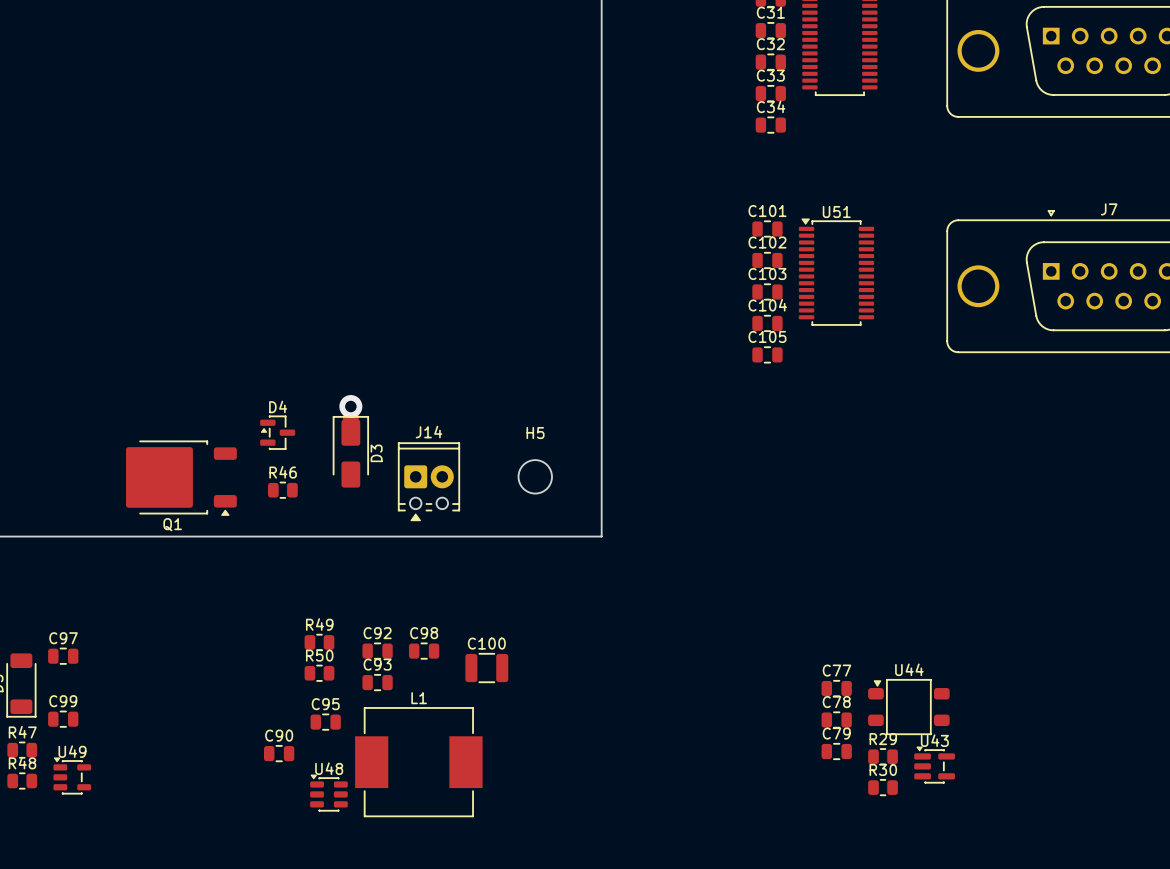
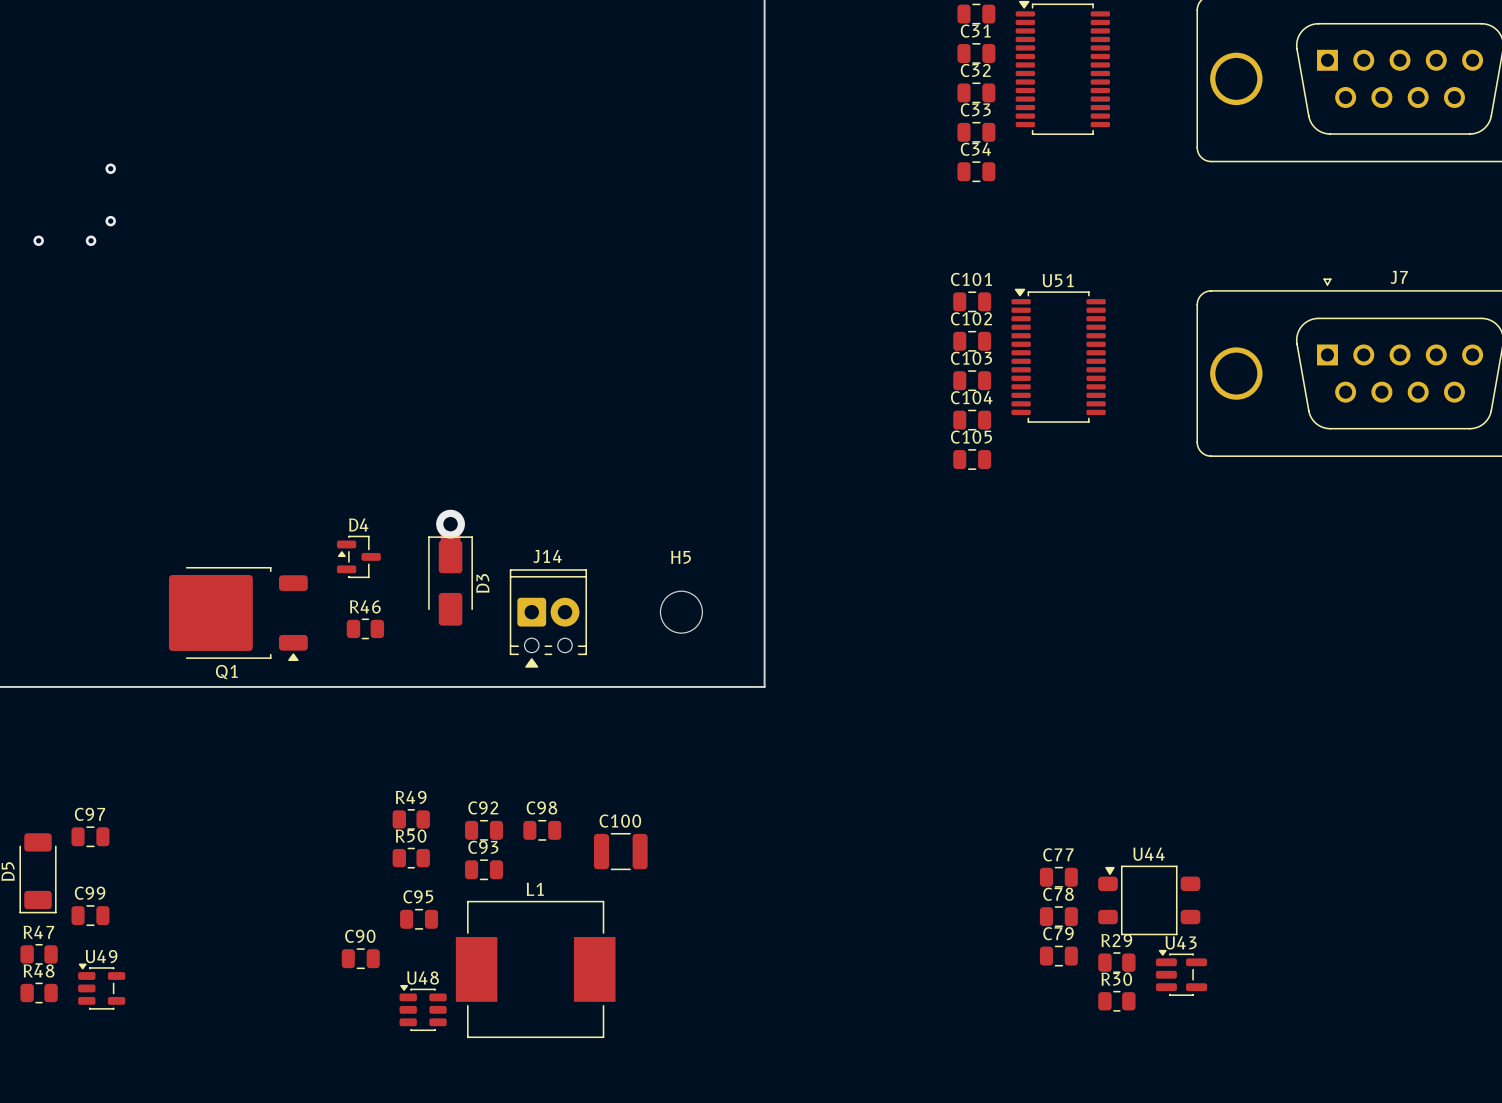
via: none -> (110, 168)
via: none -> (110, 221)
via: none -> (38, 240)
via: none -> (91, 240)

